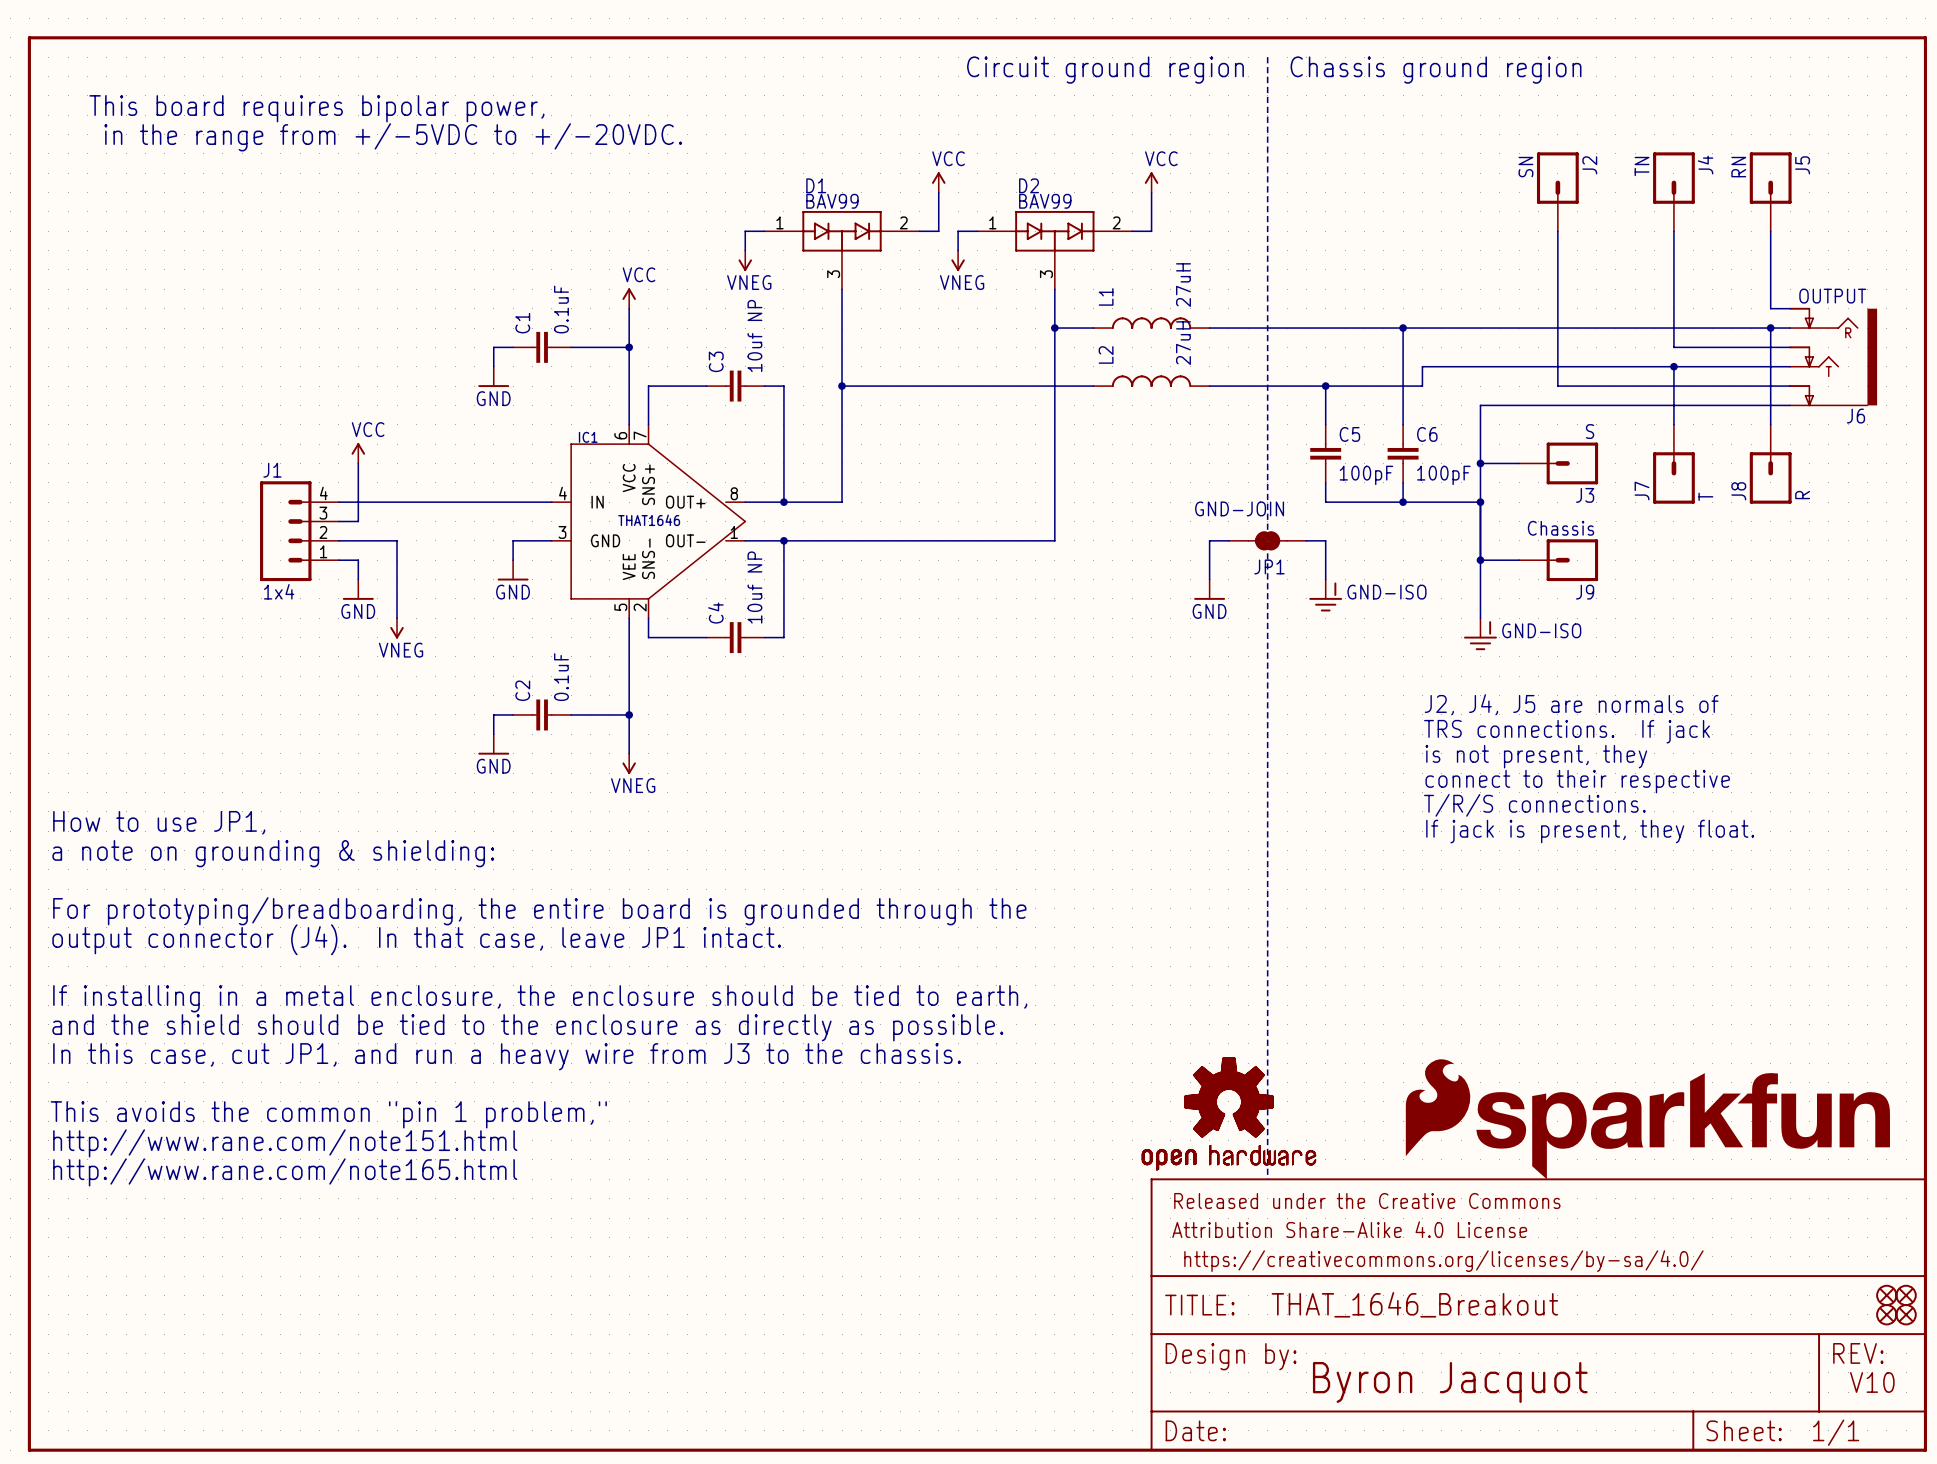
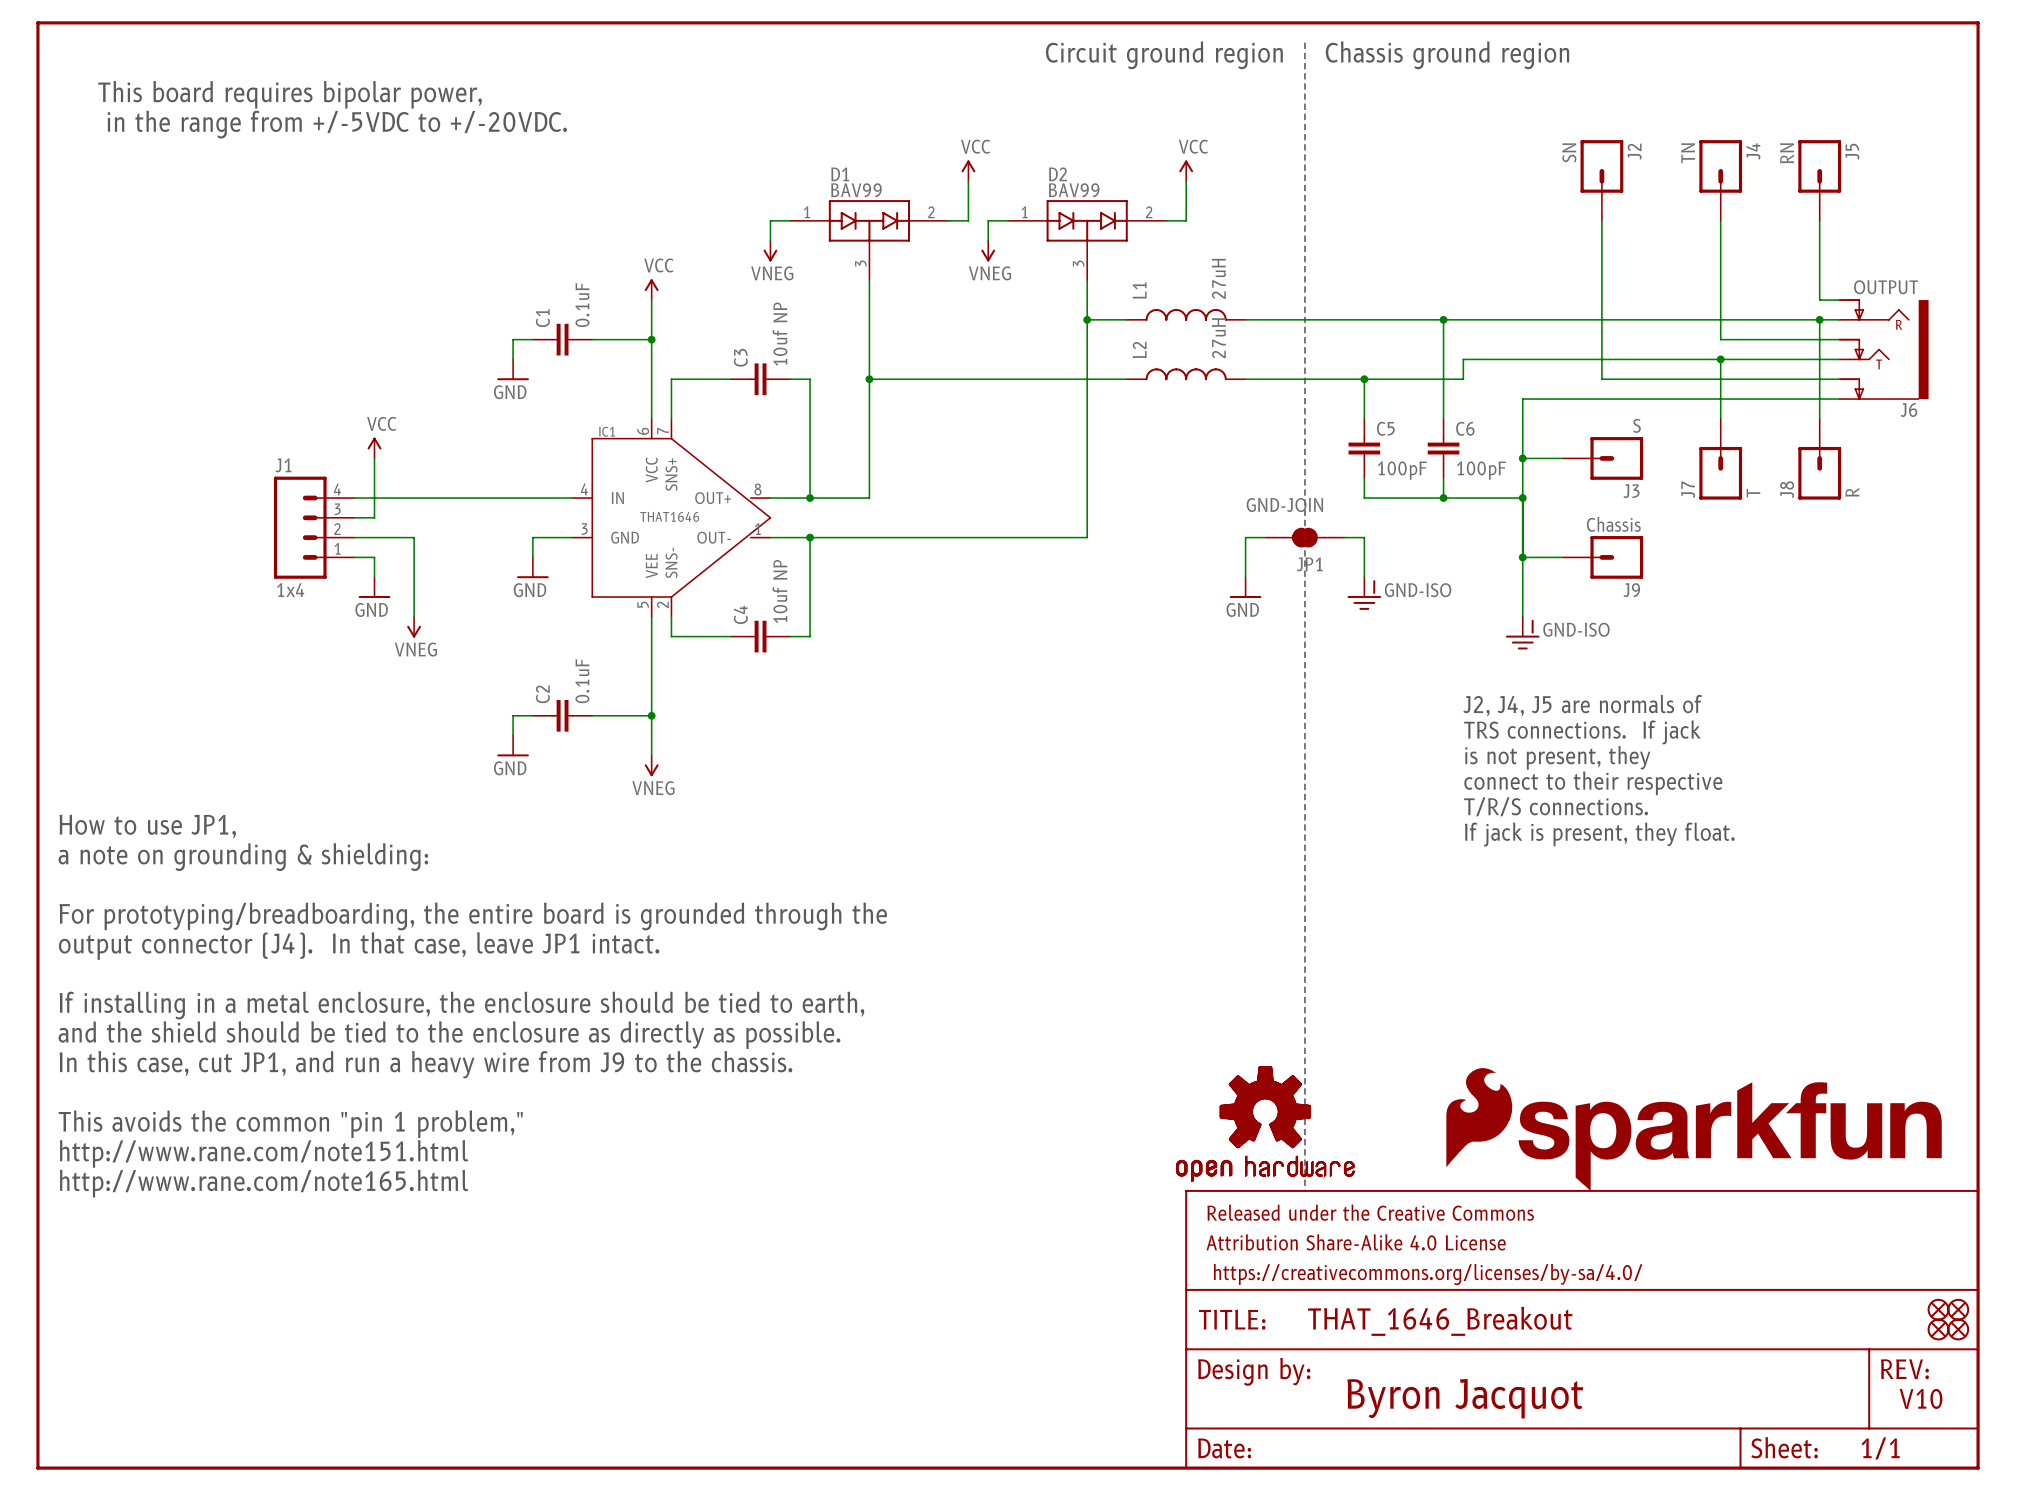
text: In this case, cut JP1, and run a heavy wire from J3 to the chassis. (507, 1056) -> In this case, cut JP1, and run a heavy wire from J9 to the chassis. (425, 1064)

